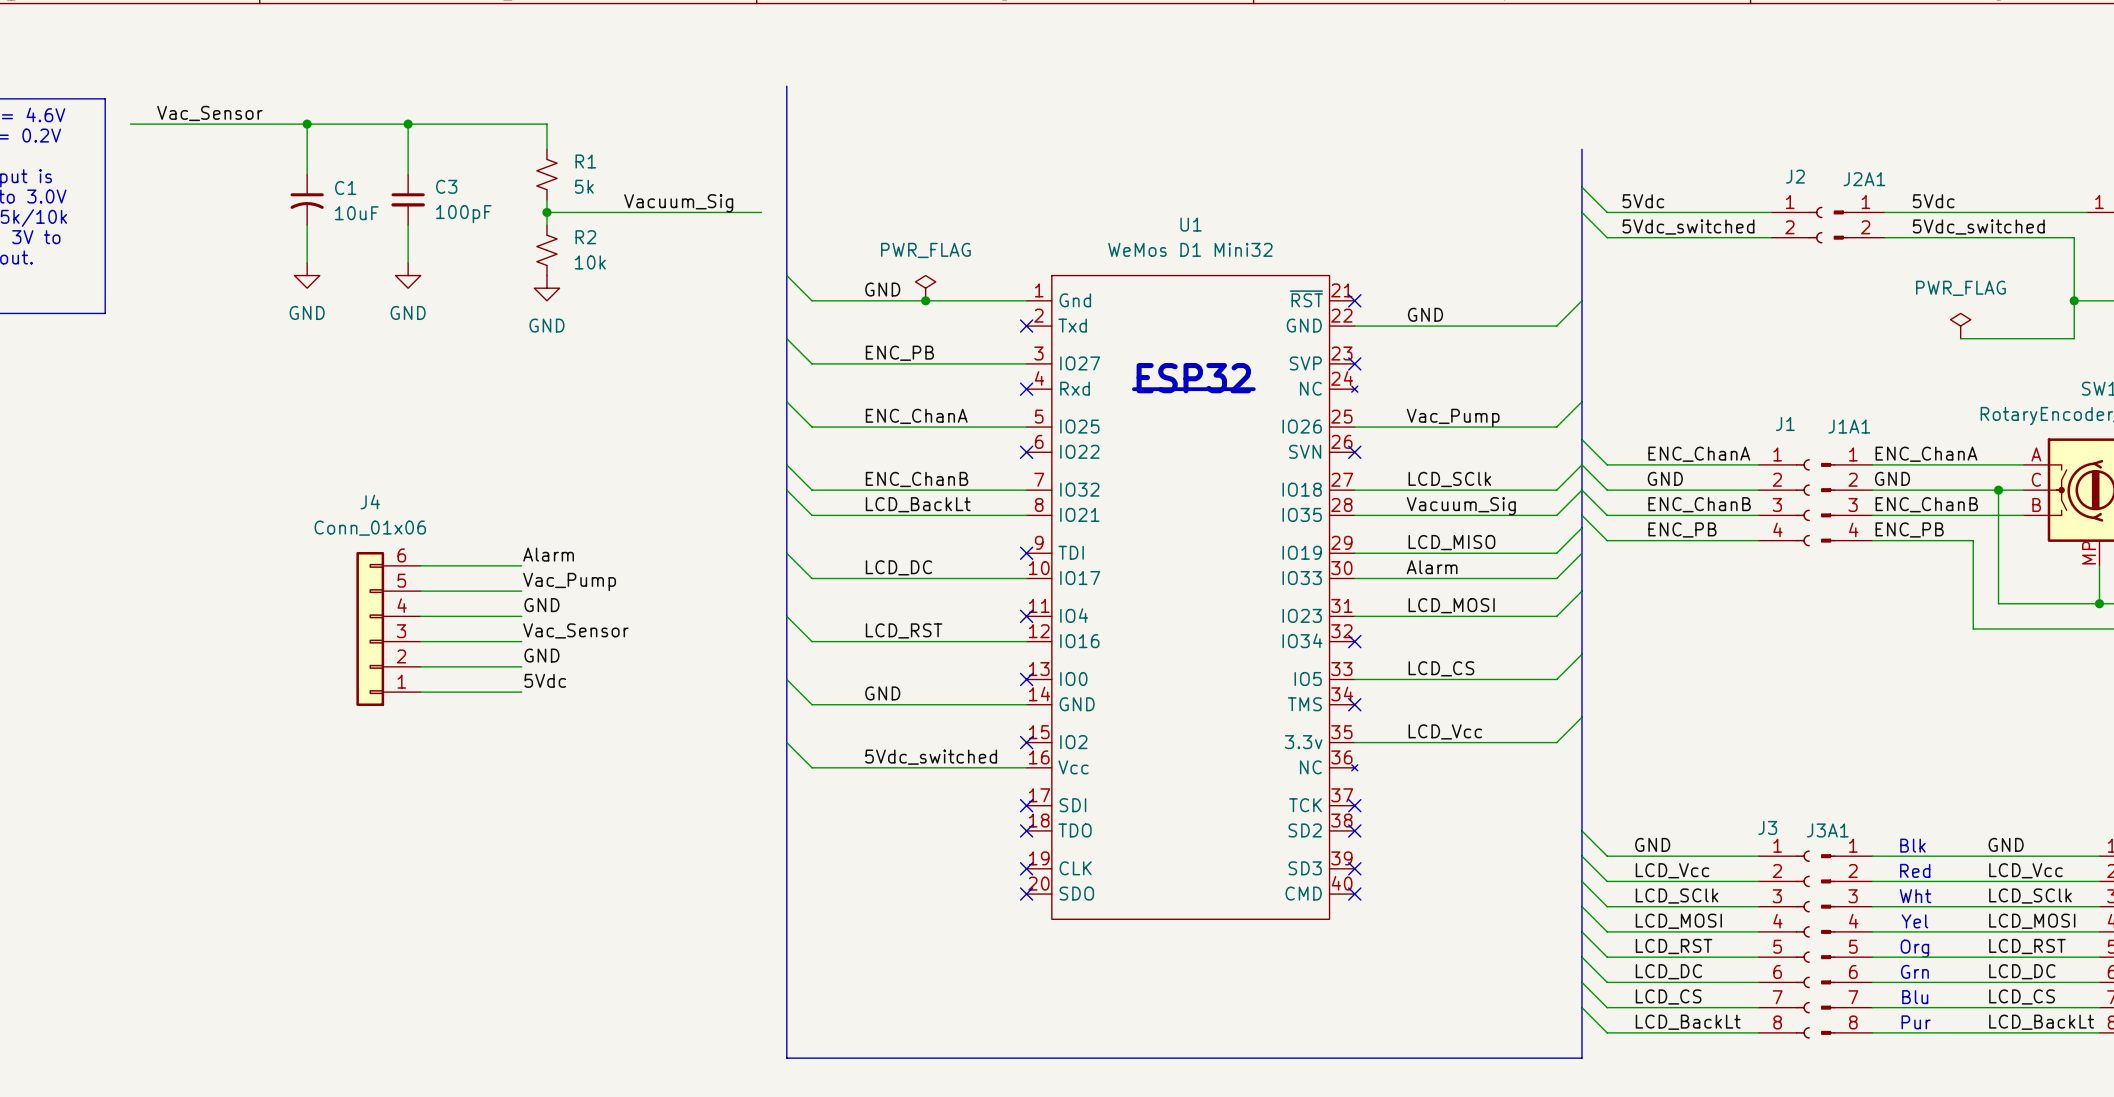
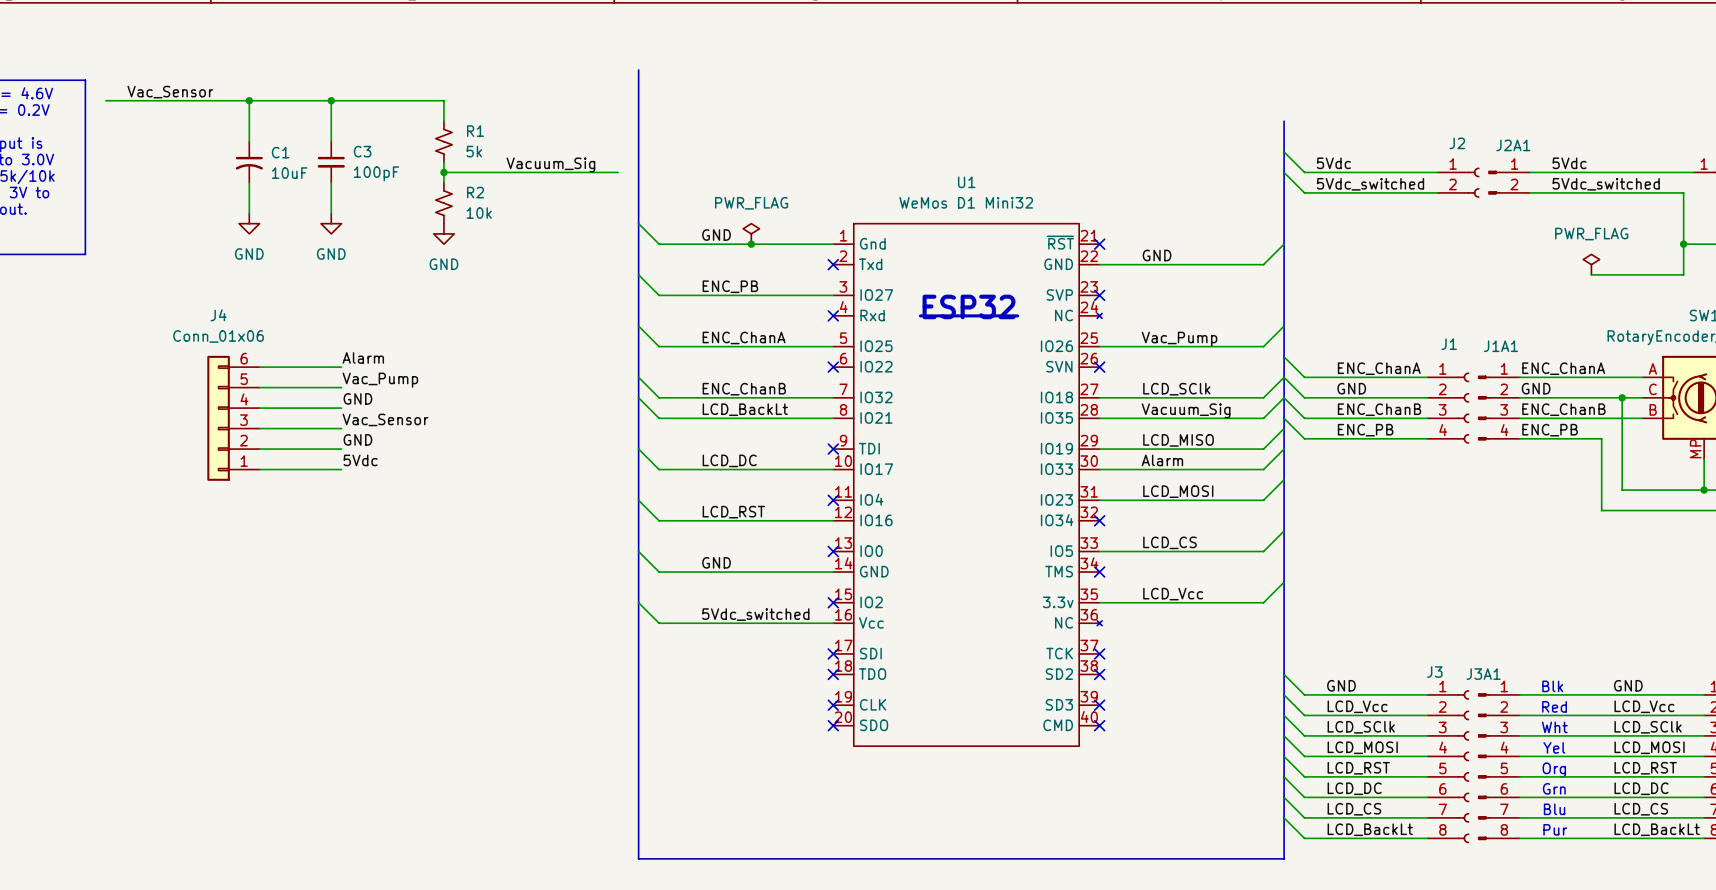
label: none -> GND (357, 398)
label: none -> GND (357, 439)
label position: Alarm (548, 554) -> Alarm (363, 357)
wire: (420, 565) (521, 565) -> (259, 367) (341, 367)
label position: Vac_Pump (569, 581) -> Vac_Pump (380, 380)
wire: (420, 591) (521, 591) -> (259, 387) (341, 387)
label: GND (541, 605) -> none
wire: (420, 616) (521, 616) -> (259, 408) (341, 408)
J4 position: (388, 628) -> (233, 418)
label position: Vac_Sensor (575, 630) -> Vac_Sensor (385, 419)
wire: (420, 641) (521, 641) -> (259, 428) (341, 428)
label: GND (541, 655) -> none
wire: (420, 666) (521, 666) -> (259, 449) (341, 449)
label position: 5Vdc (545, 680) -> 5Vdc (360, 460)
wire: (420, 692) (521, 692) -> (259, 469) (341, 469)

